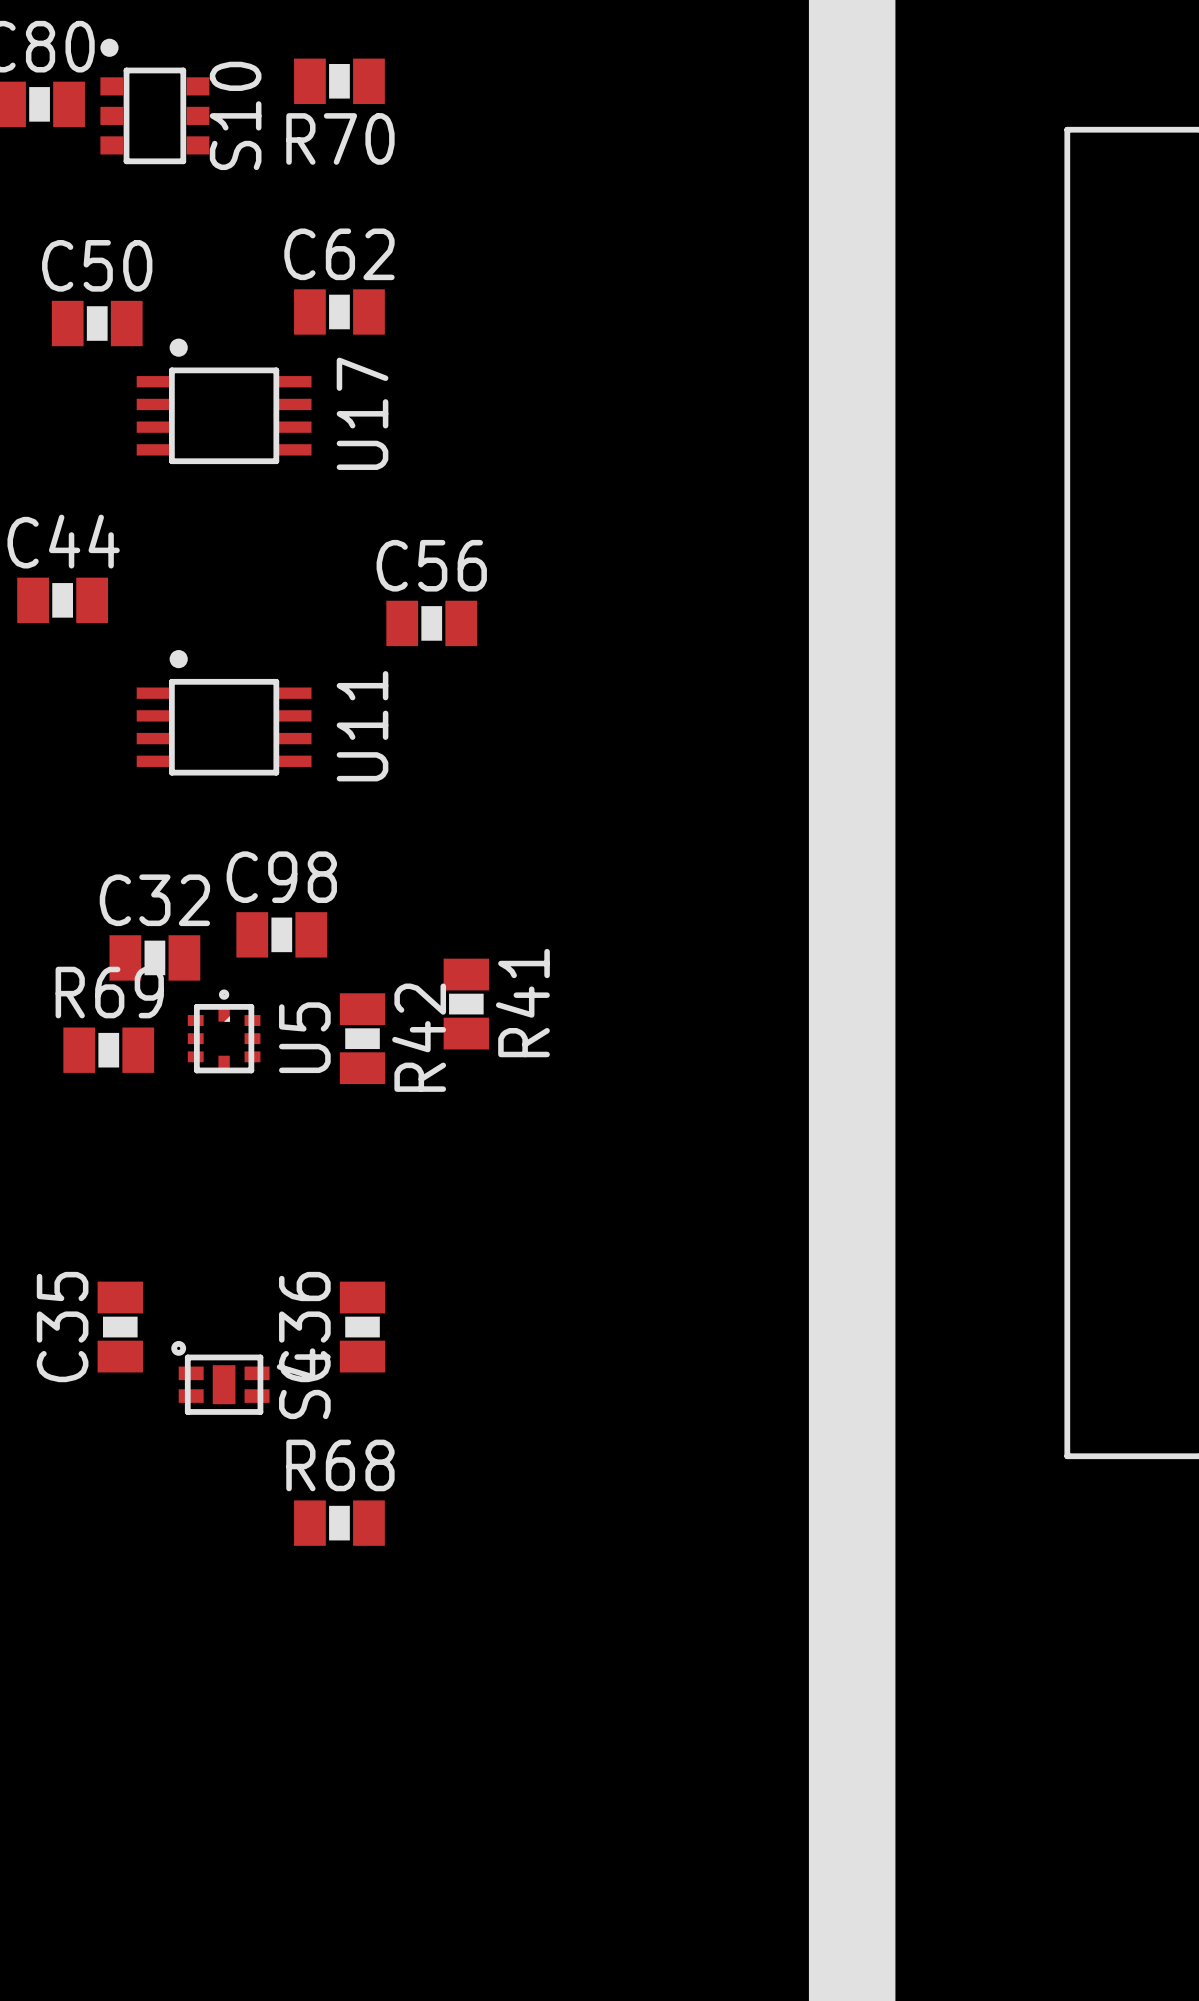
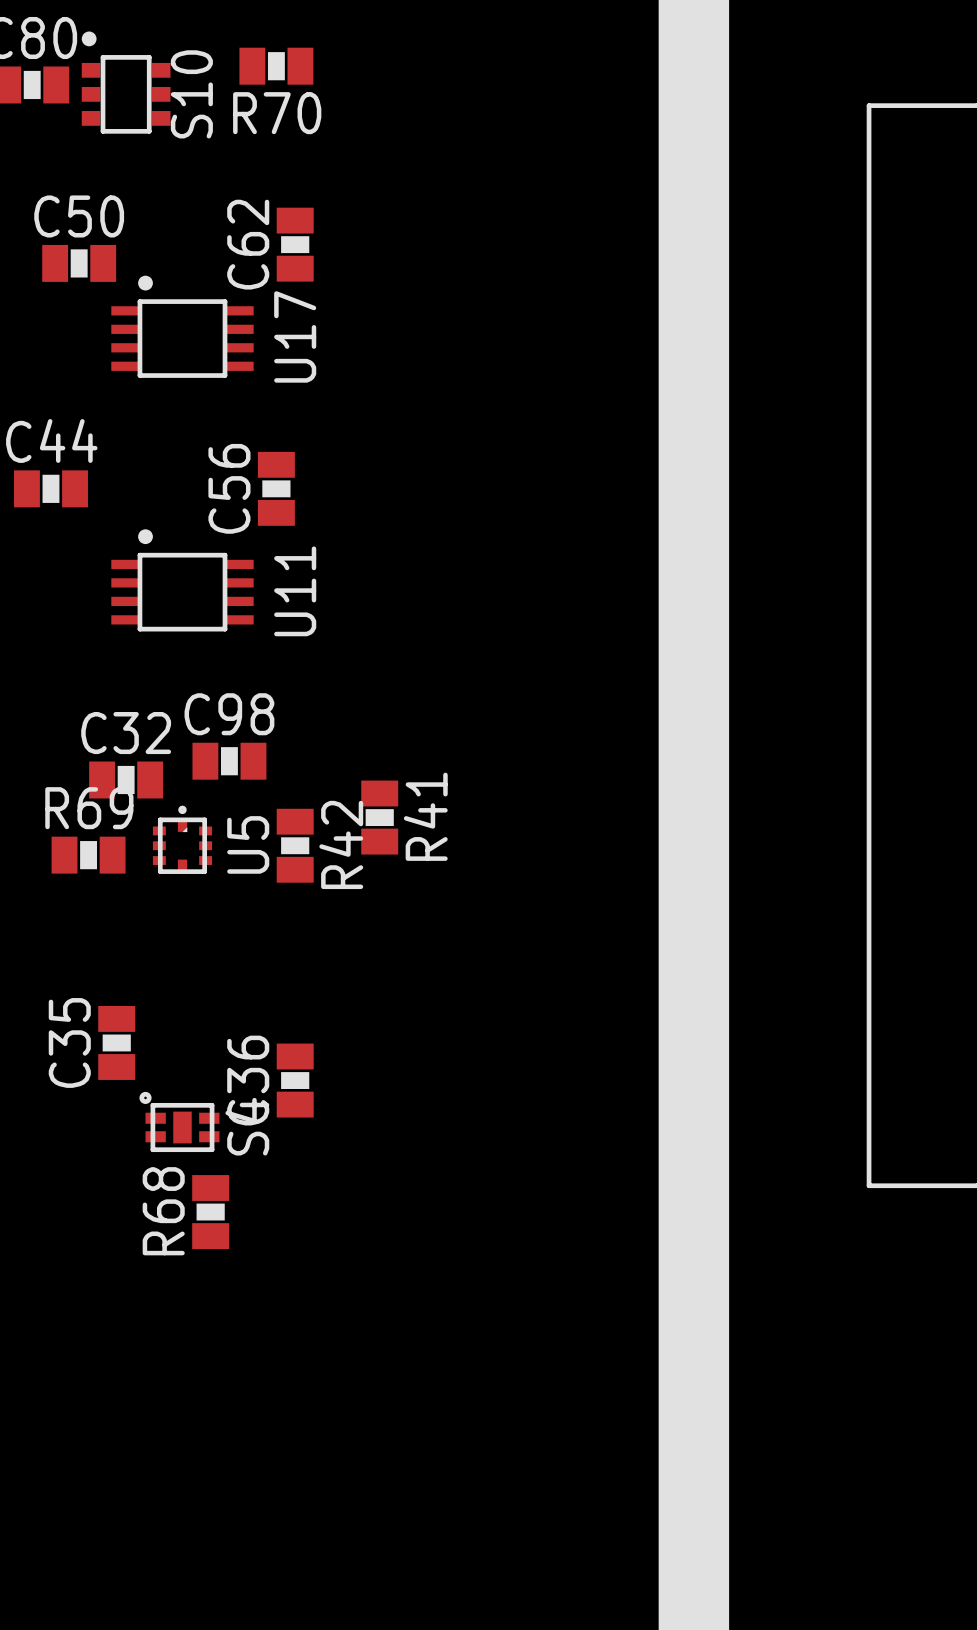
C62 rotation: 0° (339, 311) -> 90° clockwise (295, 244)
C56 rotation: 0° (431, 623) -> 90° clockwise (276, 488)
C56 position: (431, 623) -> (276, 488)
C35 position: (120, 1327) -> (116, 1042)
R68 rotation: 0° (339, 1523) -> 90° clockwise (210, 1212)
R68 position: (339, 1523) -> (210, 1212)

